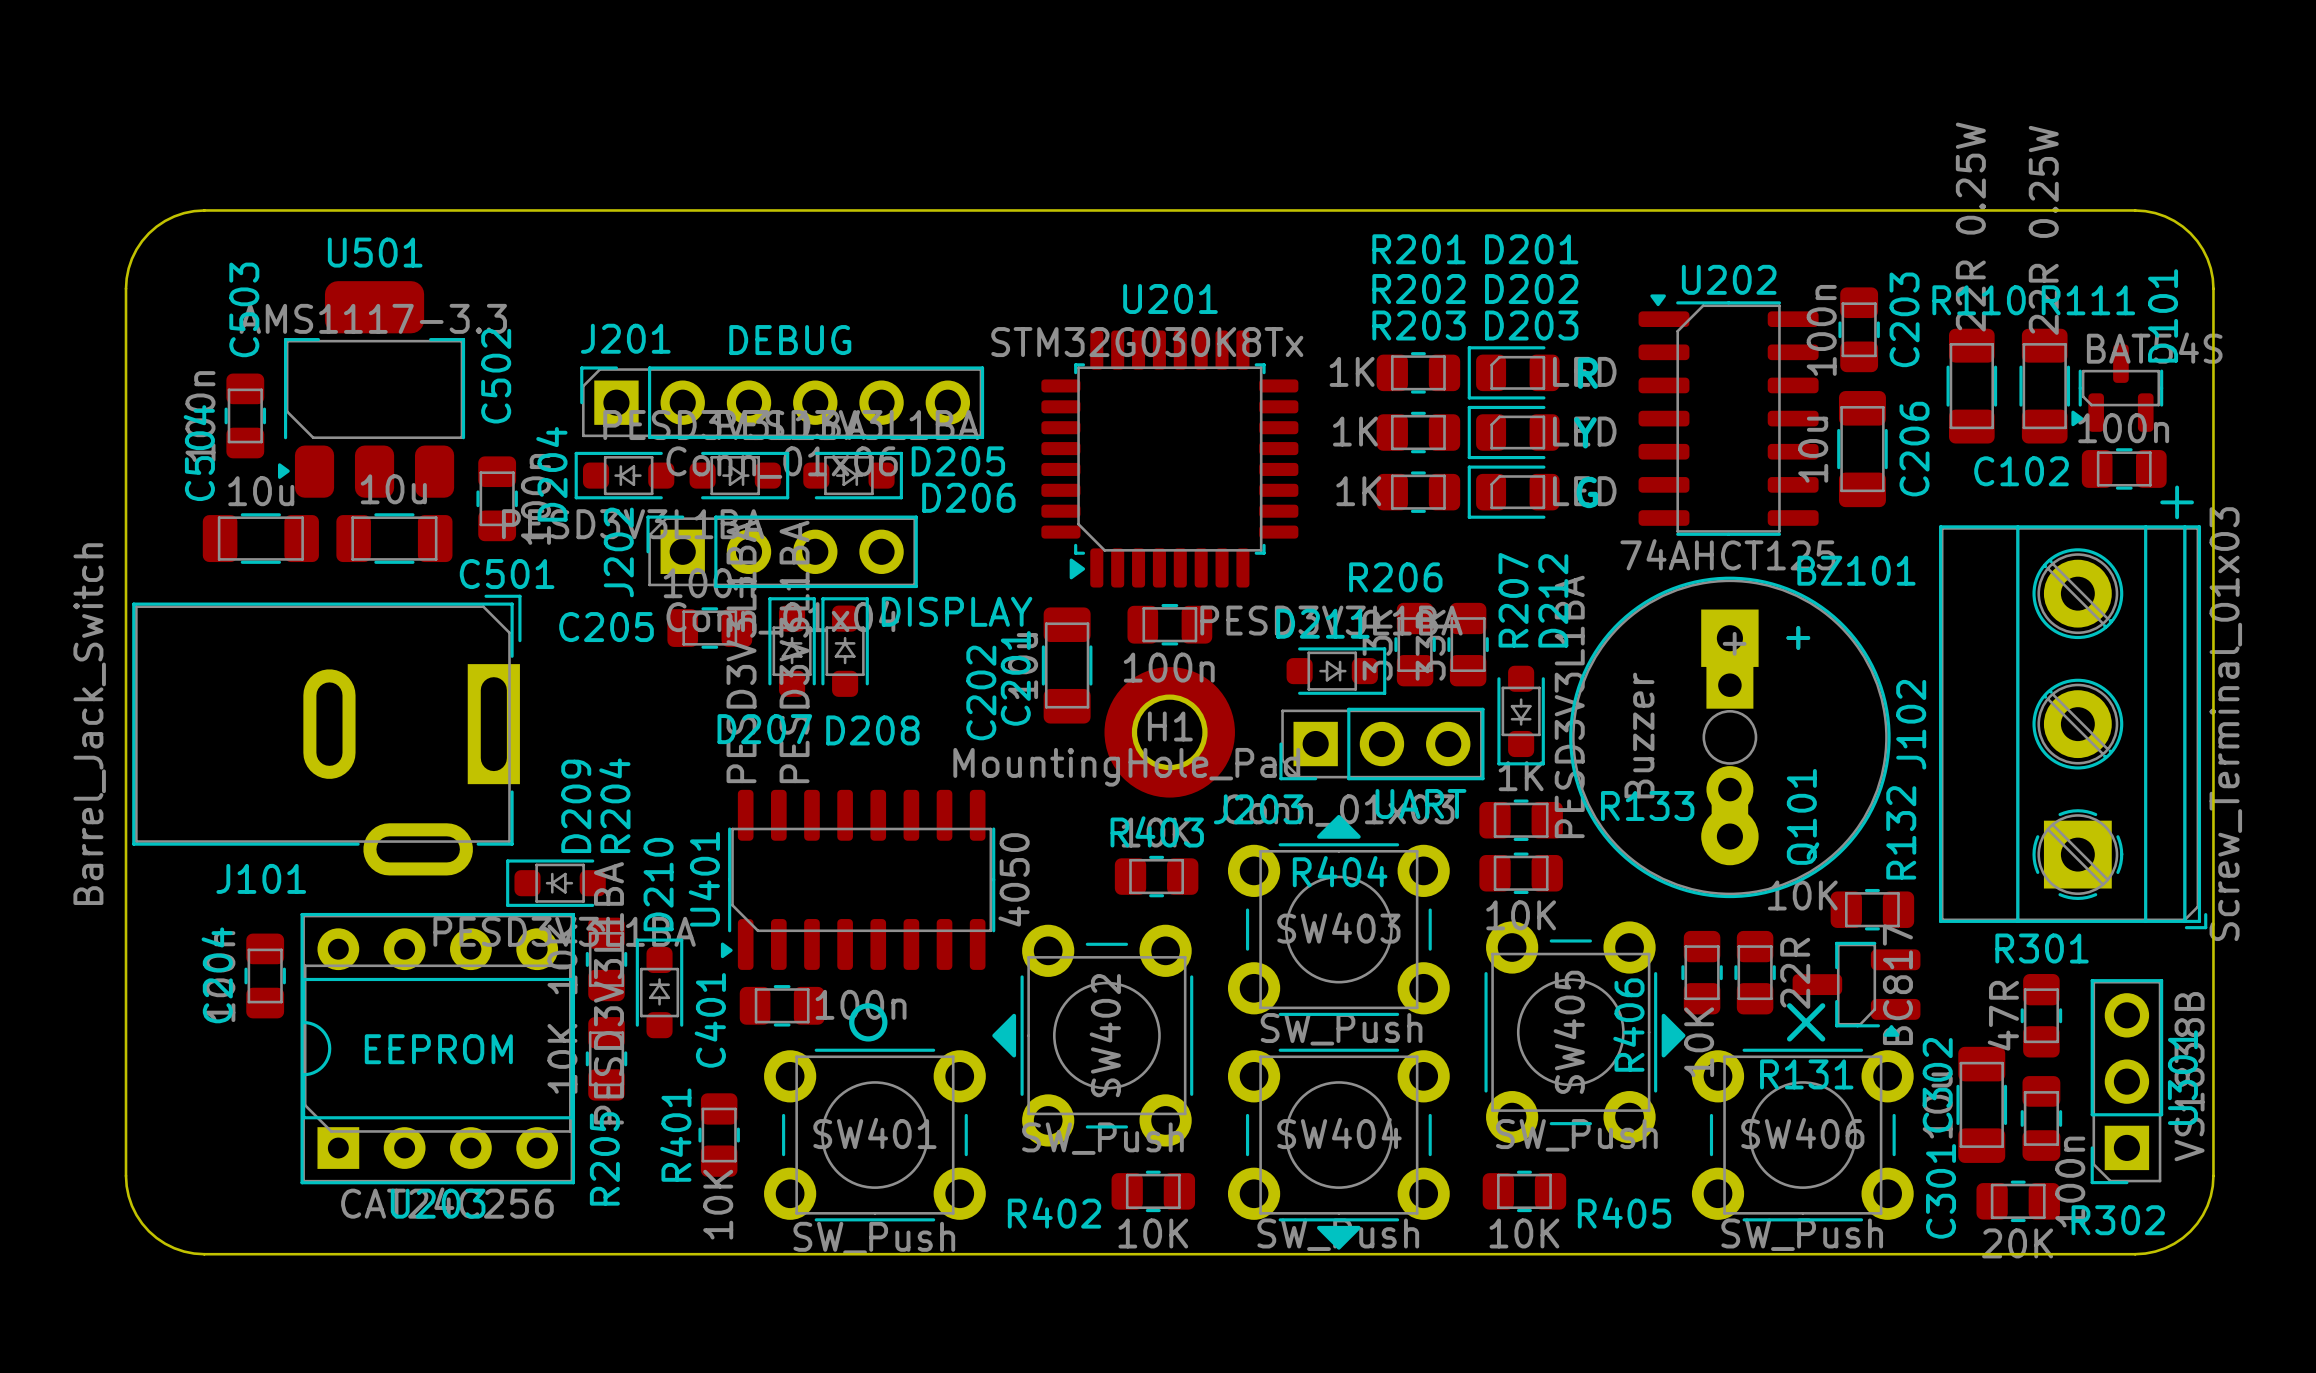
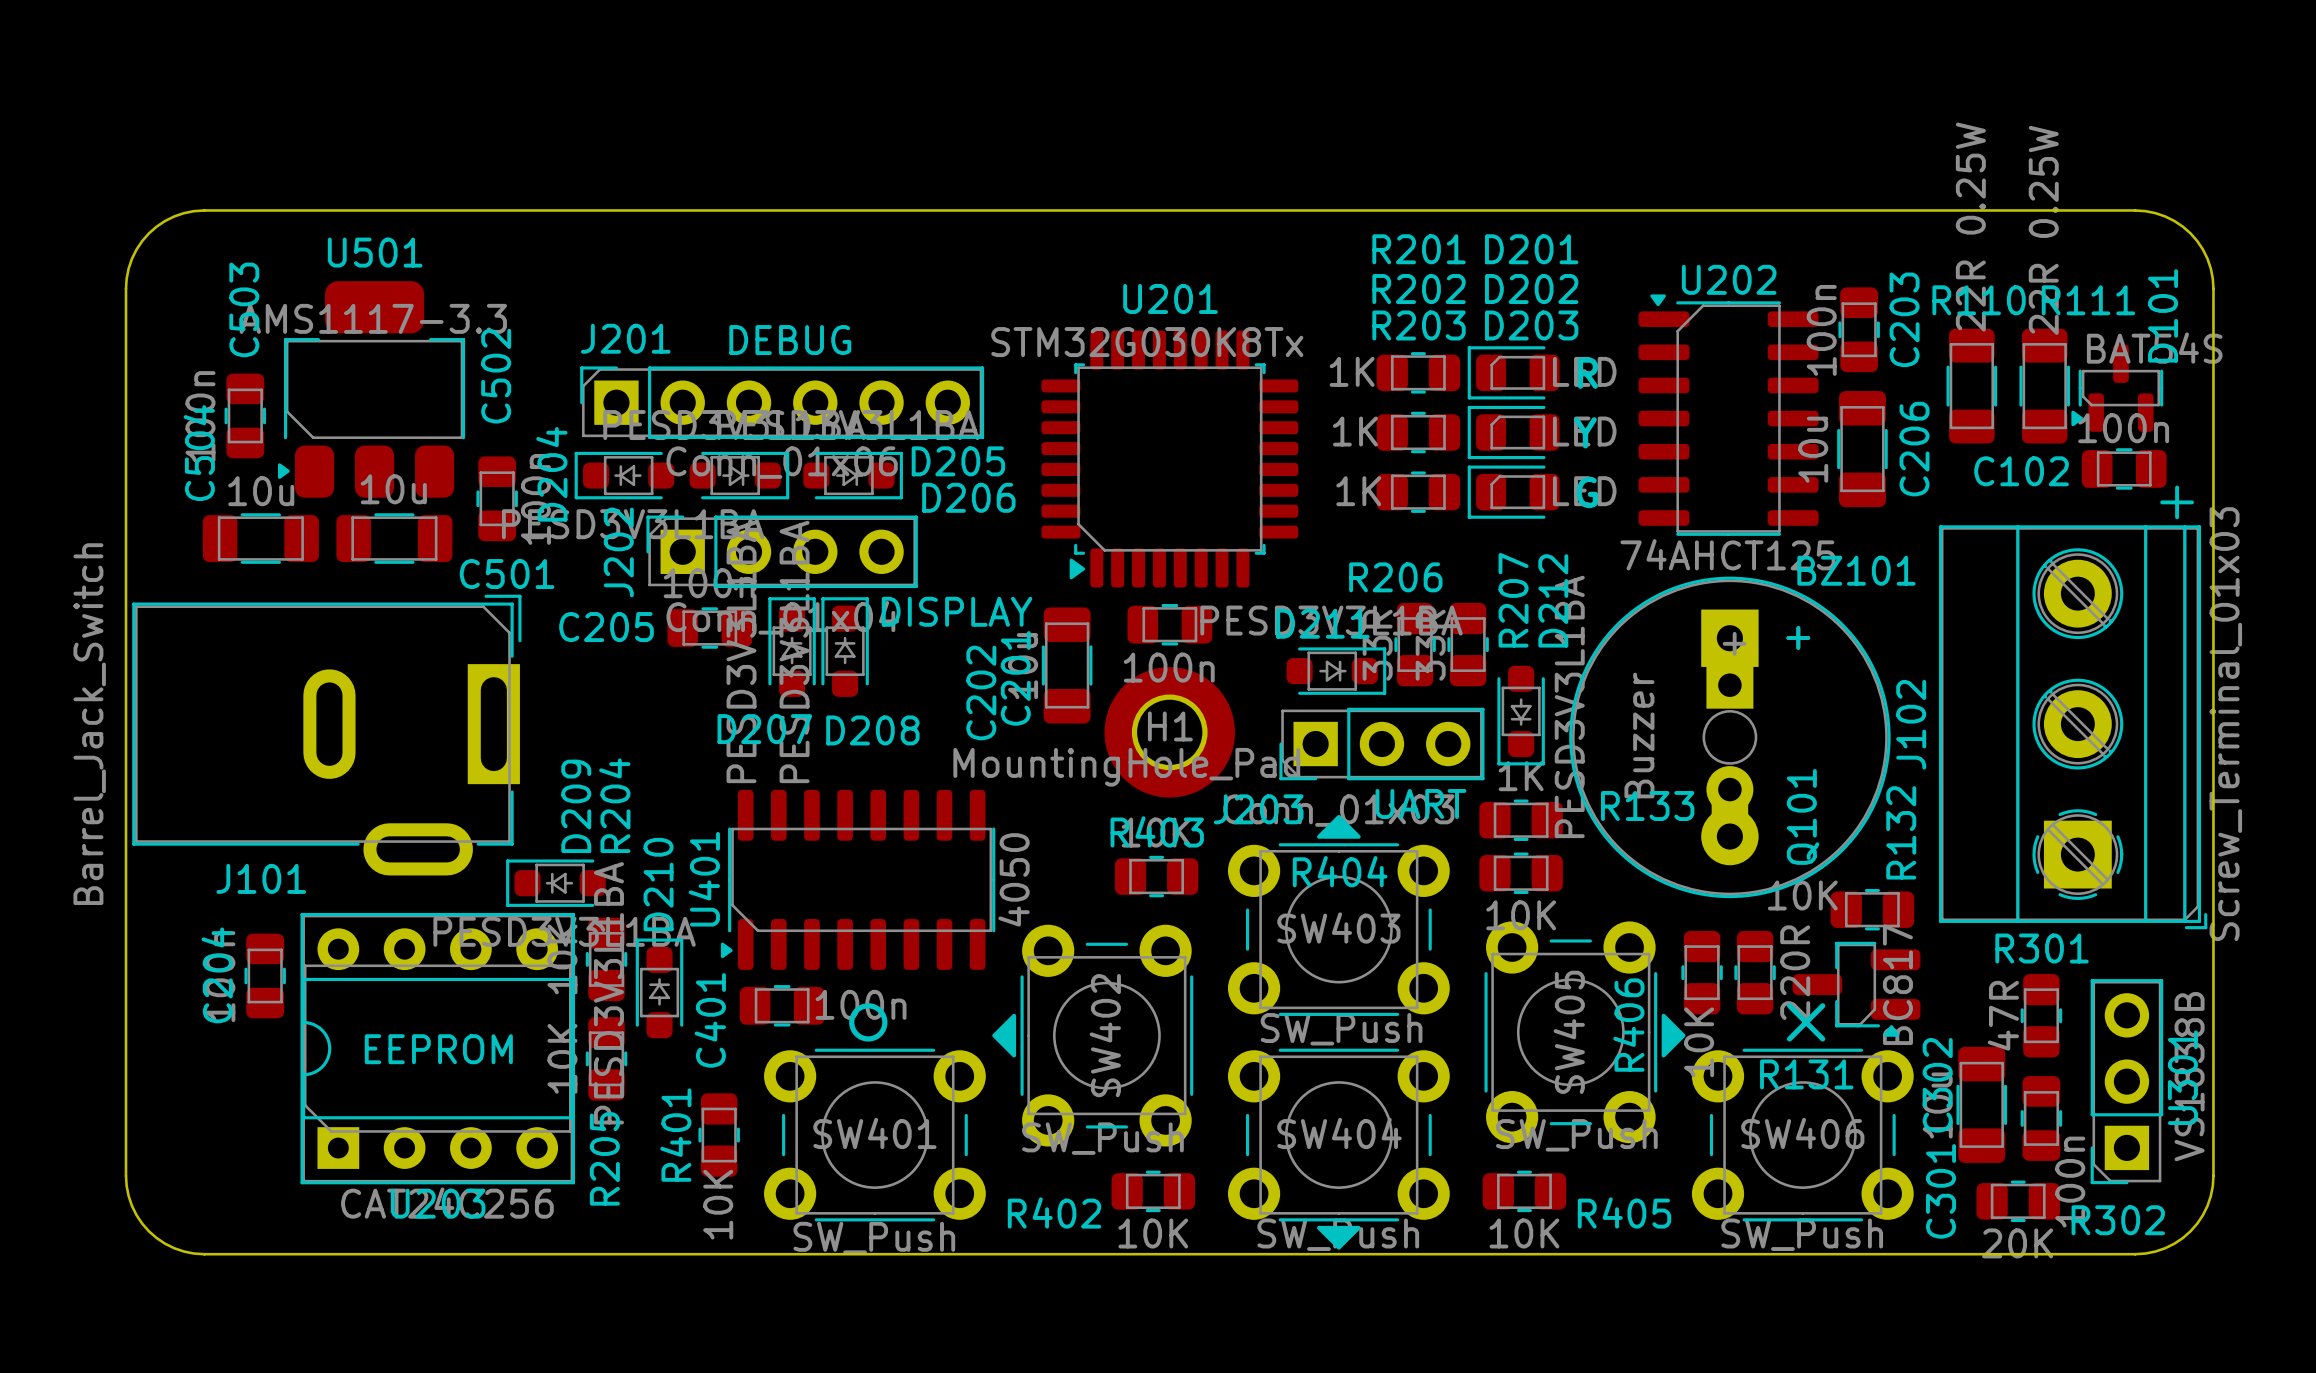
R131 value: 22R (1795, 973) -> 220R (1795, 973)

